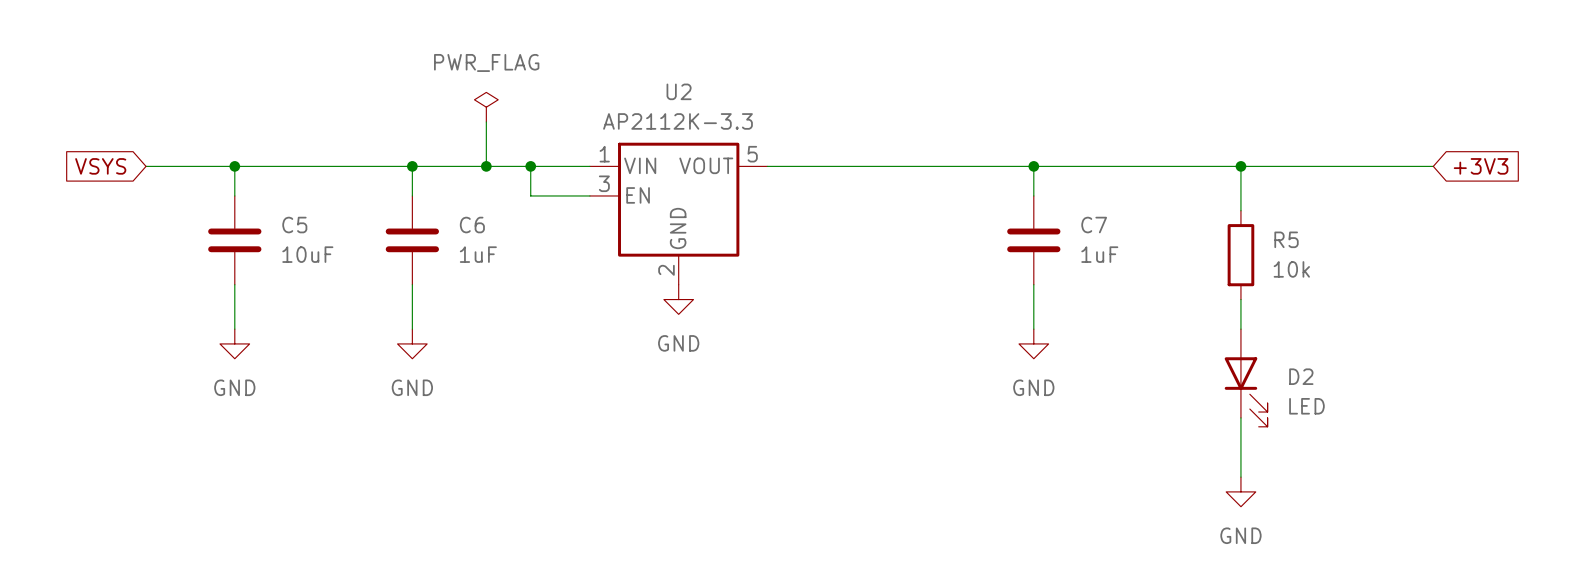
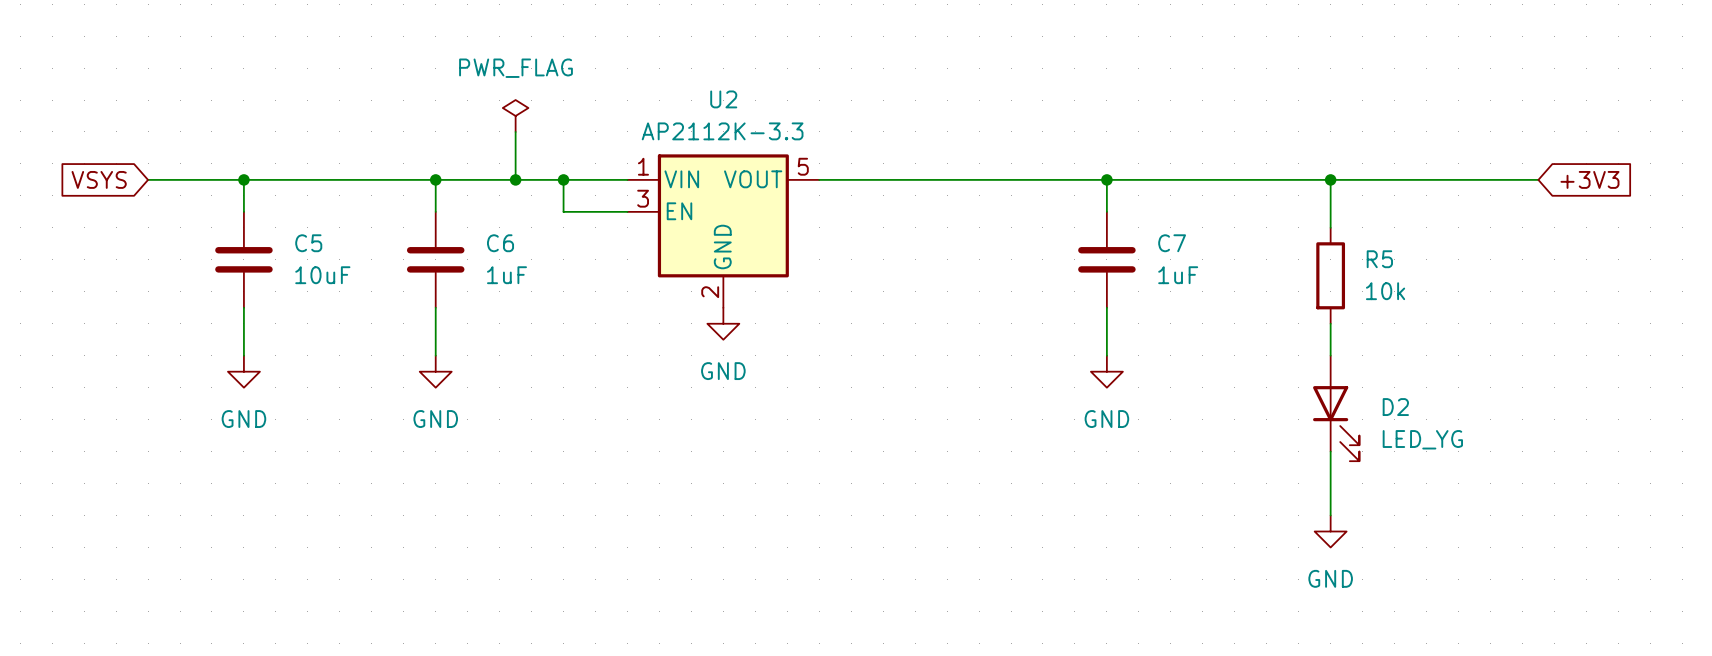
D2 value: LED (1306, 406) -> LED_YG (1422, 439)

